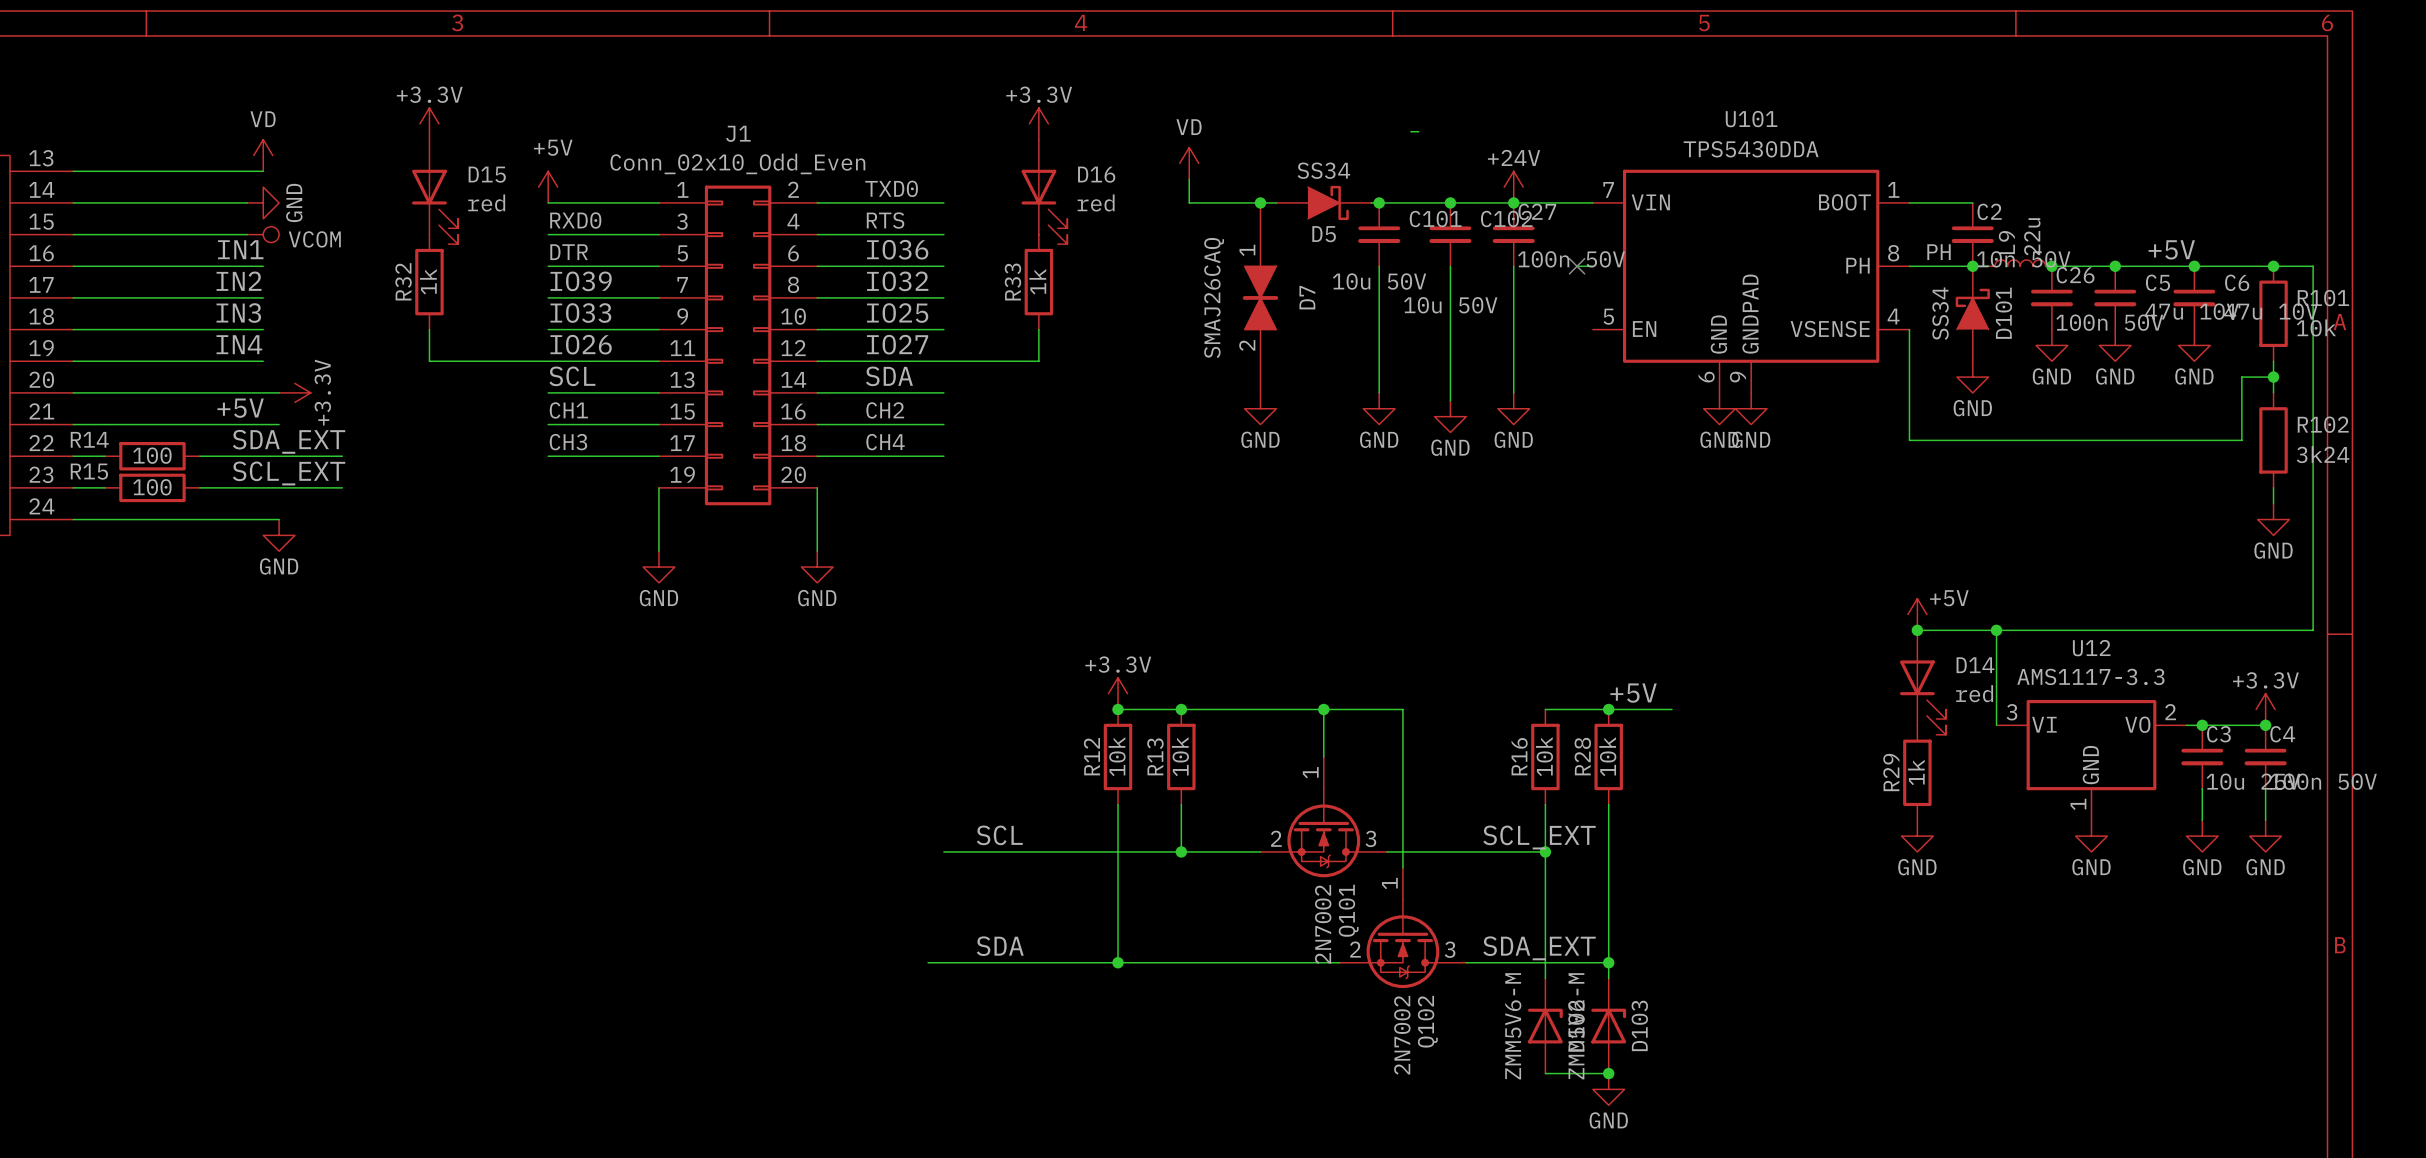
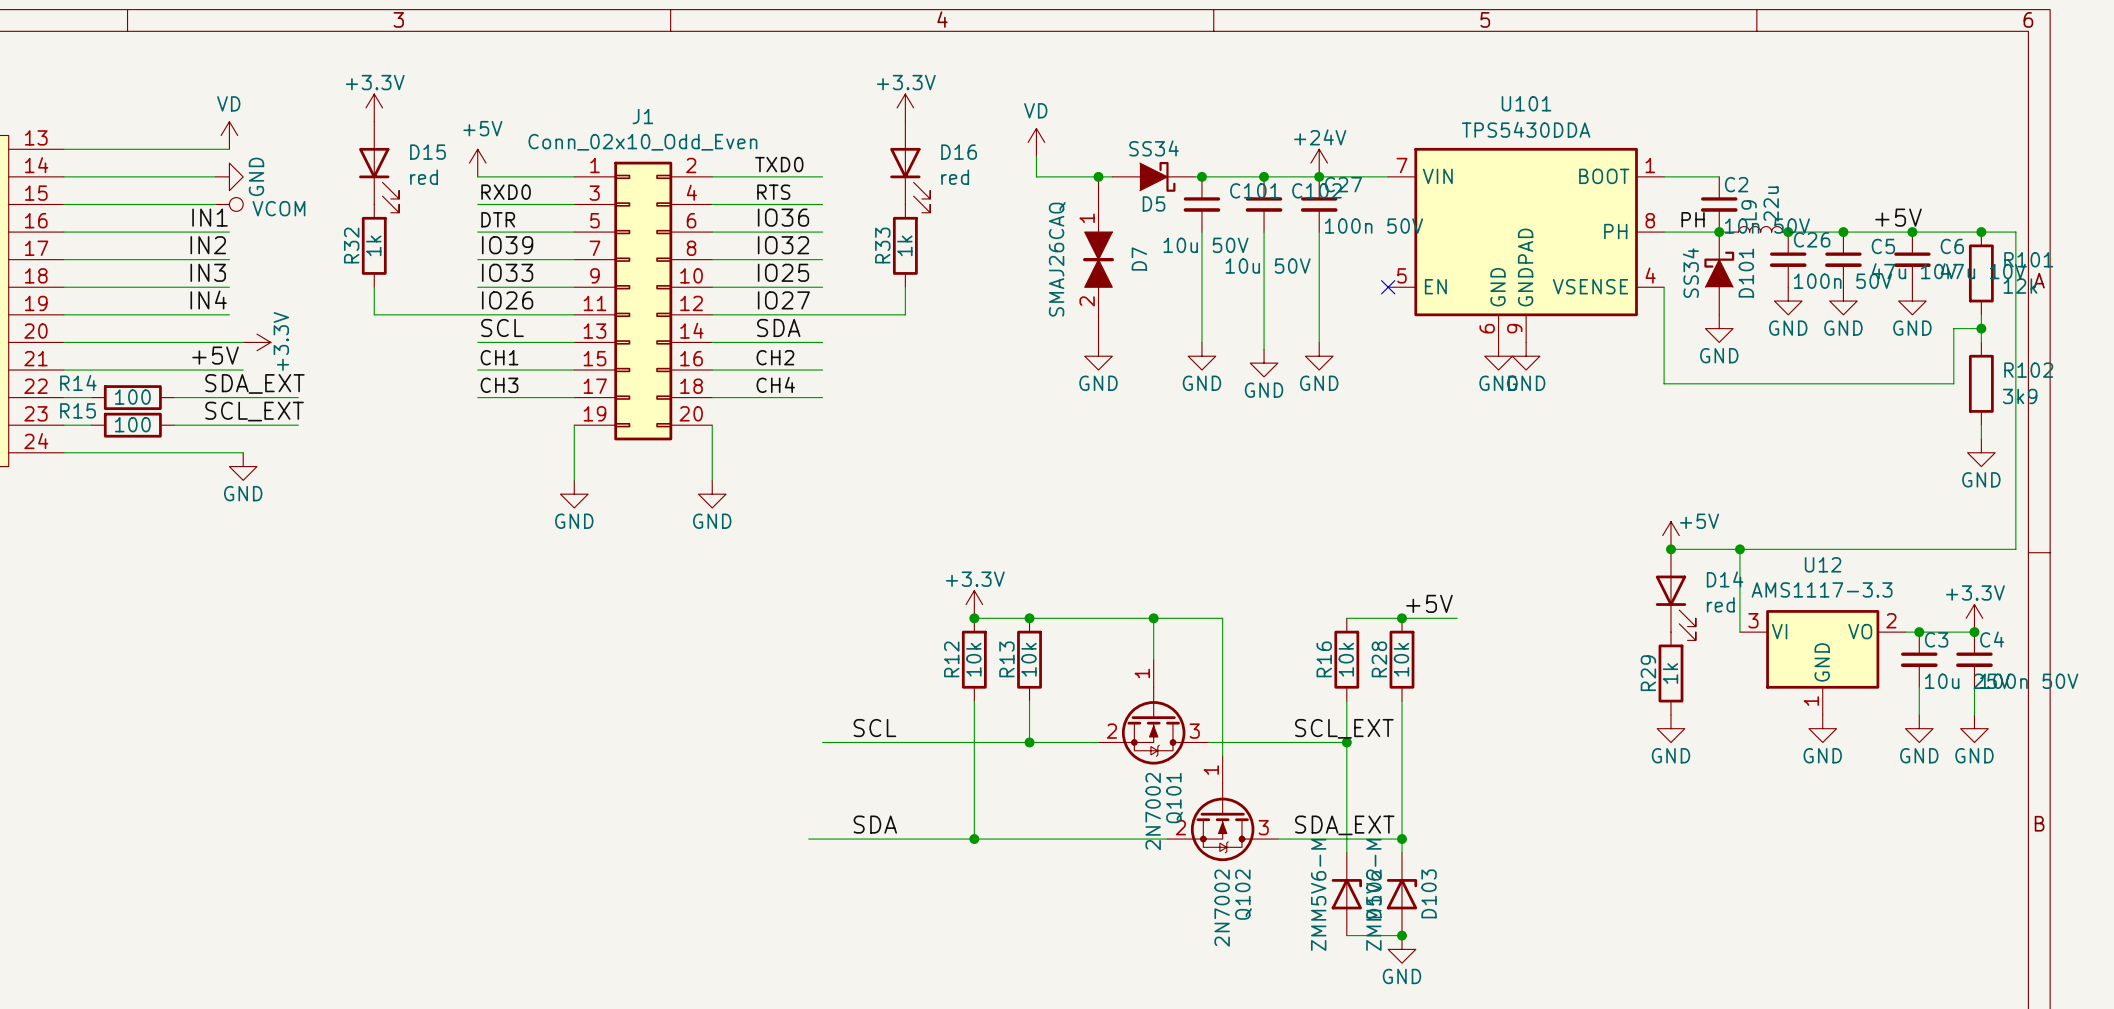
wire: (1410, 131) (1418, 131) -> none
wire: (1577, 266) (1592, 266) -> none
no-connect mark position: (1577, 266) -> (1388, 287)
R101 value: 10k (2316, 327) -> 12k (2020, 286)
R102 value: 3k24 (2323, 454) -> 3k9 (2020, 396)

